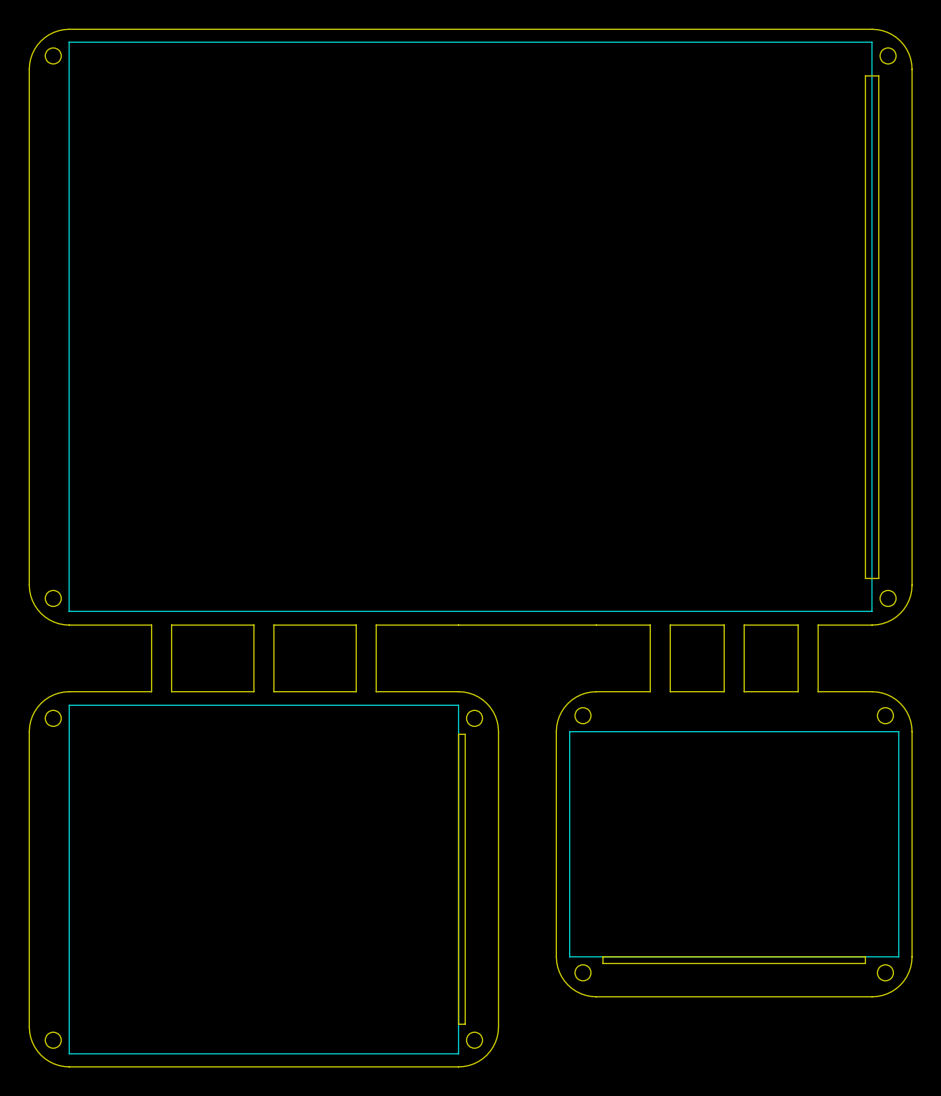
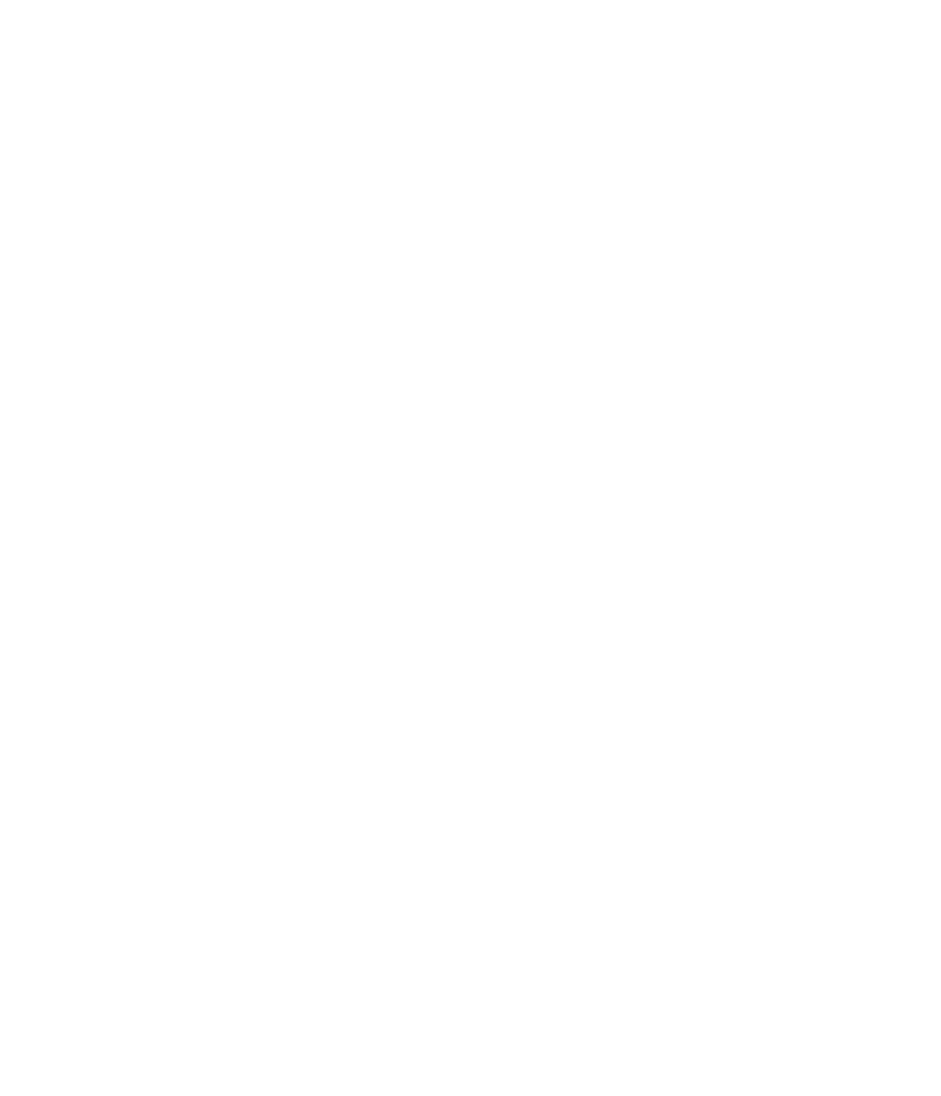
board edge: (69, 29) (872, 29) (892, 34) (903, 44) (910, 58) (912, 69) (911, 590) (903, 609) (887, 622) (872, 625) (818, 625) (818, 691) (882, 693) (900, 703) (910, 721) (912, 956) (909, 972) (896, 988) (887, 993) (872, 996) (596, 996) (581, 993) (571, 988) (561, 976) (556, 956) (557, 721) (568, 703) (585, 693) (650, 691) (650, 625) (376, 625) (376, 691) (468, 693) (486, 703) (497, 721) (498, 1026) (497, 1037) (490, 1051) (478, 1061) (458, 1066) (69, 1066) (49, 1061) (37, 1051) (32, 1042) (29, 1026) (30, 721) (41, 703) (58, 693) (151, 691) (151, 625) (58, 623) (41, 613) (34, 605) (29, 590) (29, 64) (34, 49) (44, 37) (58, 30) (69, 29) -> none
line: (69, 42) (871, 42) (871, 611) (69, 611) (69, 42) -> none
round board edge: [44, 47, 62, 65] -> none
round board edge: [879, 47, 897, 65] -> none
board edge: (865, 75) (865, 578) (878, 578) (878, 75) (865, 75) -> none
round board edge: [44, 589, 62, 608] -> none
round board edge: [879, 589, 897, 608] -> none
board edge: (171, 625) (253, 625) (253, 691) (171, 691) (171, 625) -> none
board edge: (273, 625) (356, 625) (356, 691) (273, 691) (273, 625) -> none
board edge: (670, 625) (724, 625) (724, 691) (670, 691) (670, 625) -> none
board edge: (744, 625) (798, 625) (798, 691) (744, 691) (744, 625) -> none
line: (69, 705) (458, 705) (458, 1053) (69, 1053) (69, 705) -> none
round board edge: [574, 707, 592, 725] -> none
round board edge: [876, 707, 895, 725] -> none
round board edge: [44, 709, 62, 728] -> none
round board edge: [465, 709, 484, 728] -> none
line: (569, 731) (898, 731) (898, 956) (569, 956) (569, 731) -> none
board edge: (458, 734) (465, 734) (465, 1024) (458, 1024) (458, 734) -> none
board edge: (602, 956) (865, 956) (865, 963) (602, 963) (602, 956) -> none
round board edge: [574, 964, 592, 982] -> none
round board edge: [876, 964, 895, 982] -> none
round board edge: [44, 1031, 62, 1049] -> none
round board edge: [465, 1031, 484, 1049] -> none

